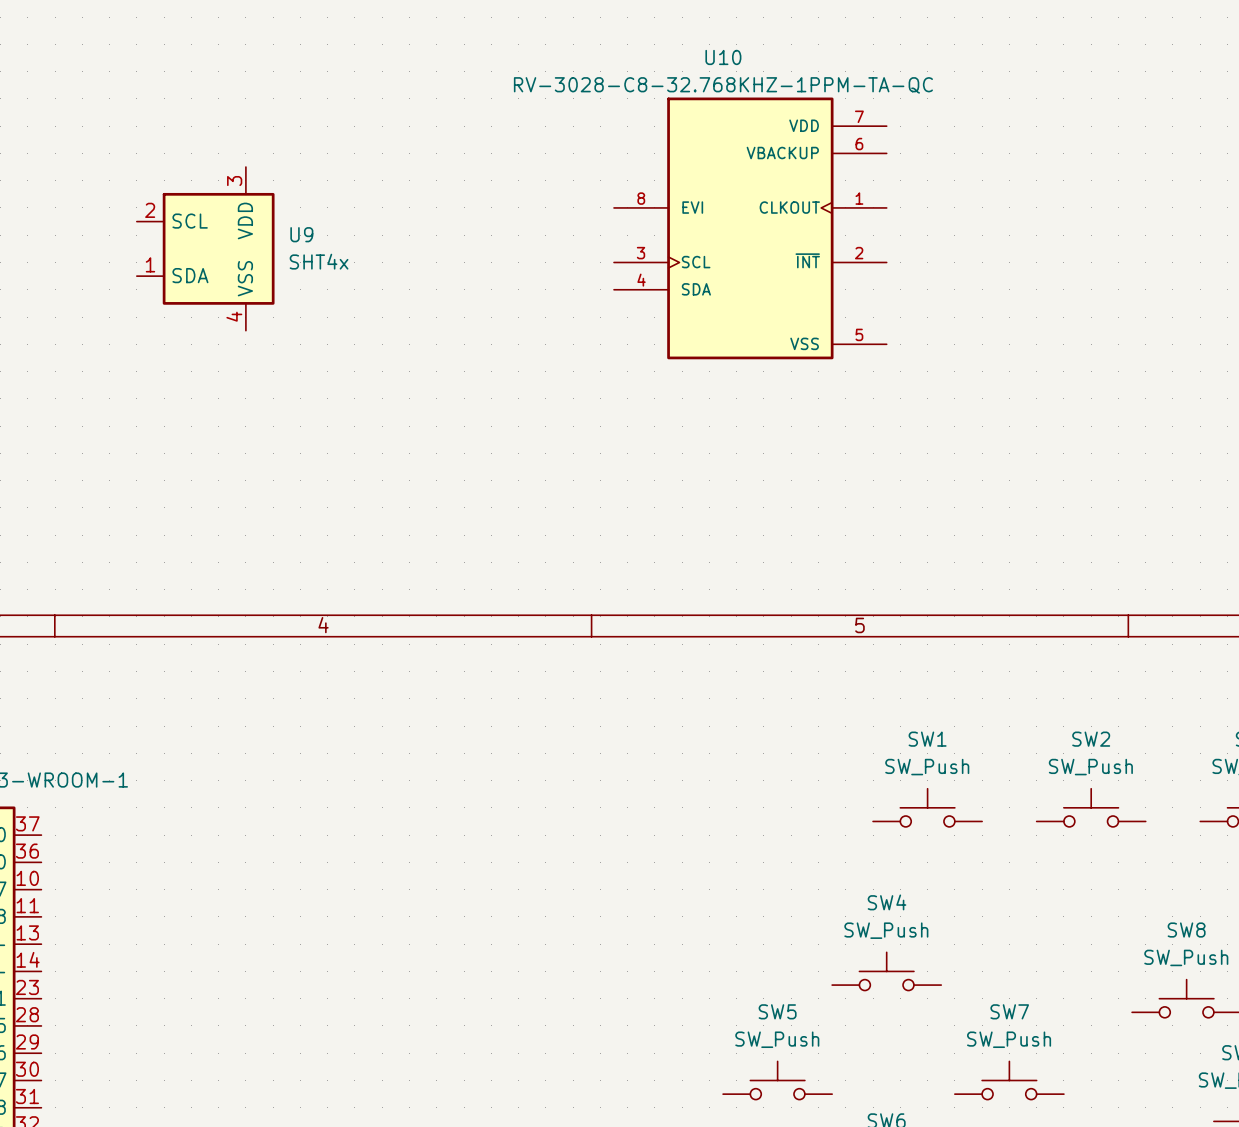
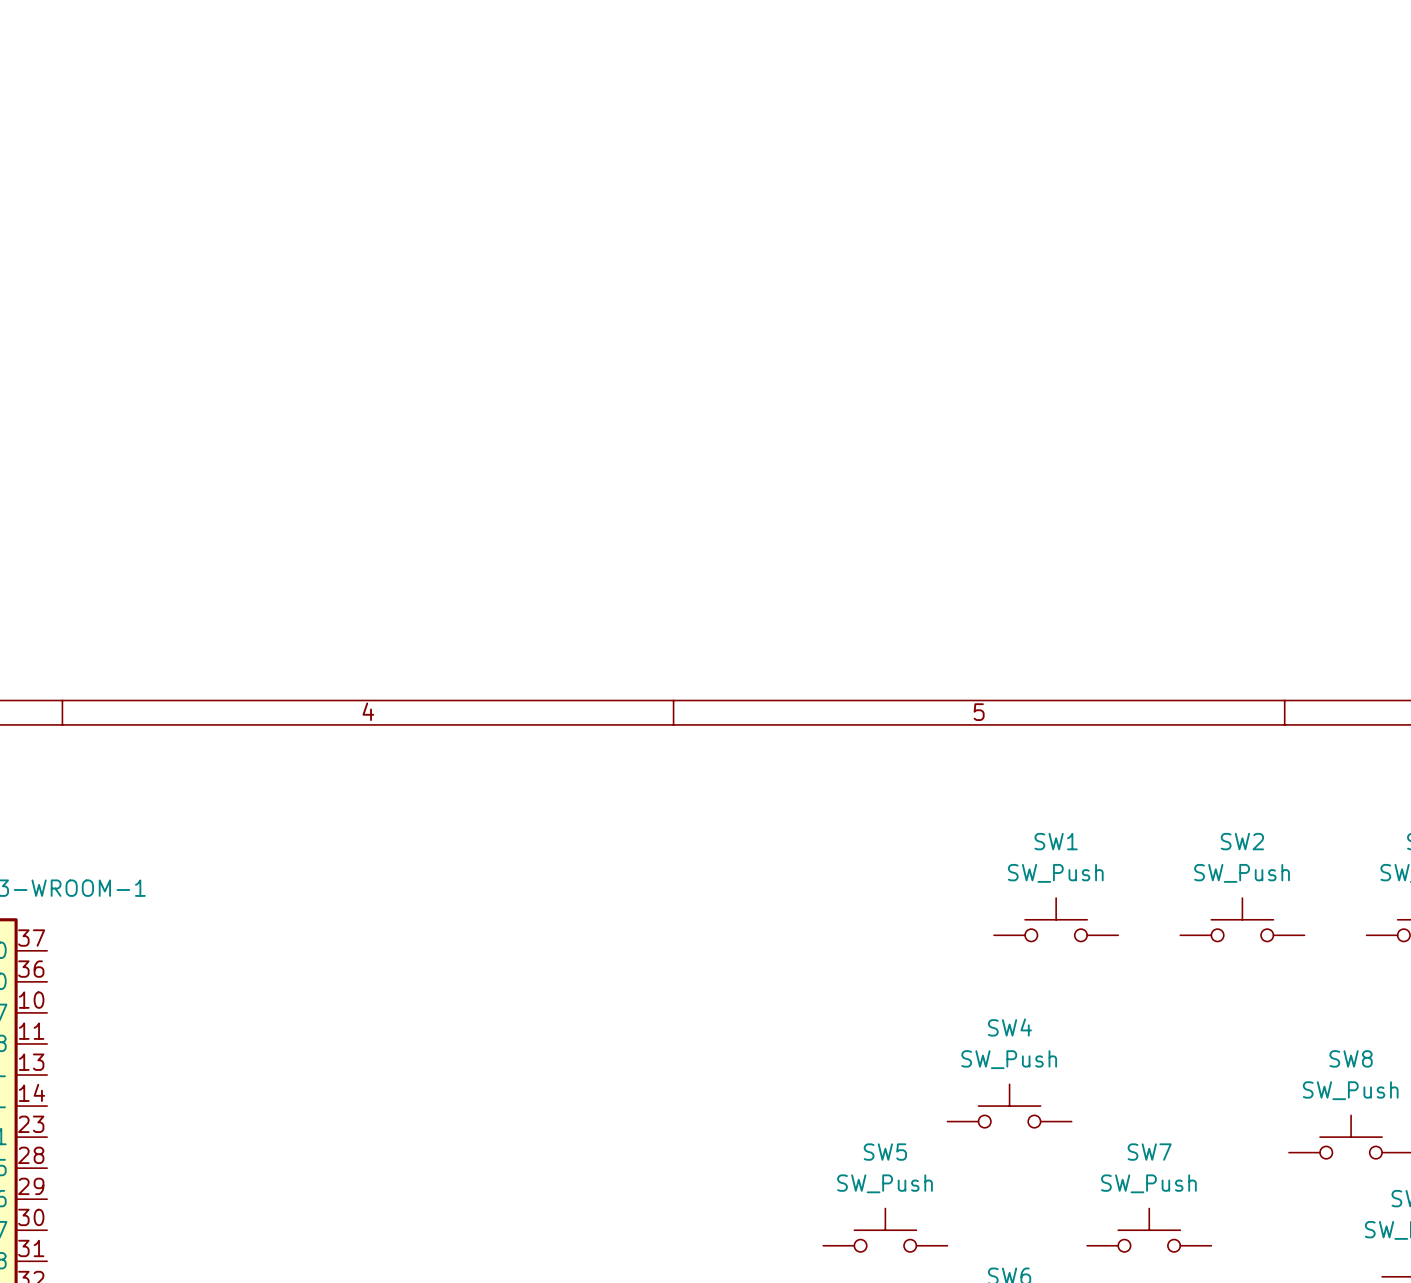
U10: RV-3028-C8-32.768KHZ-1PPM-TA-QC (750, 228) -> none
U9: SHT4x (205, 248) -> none

